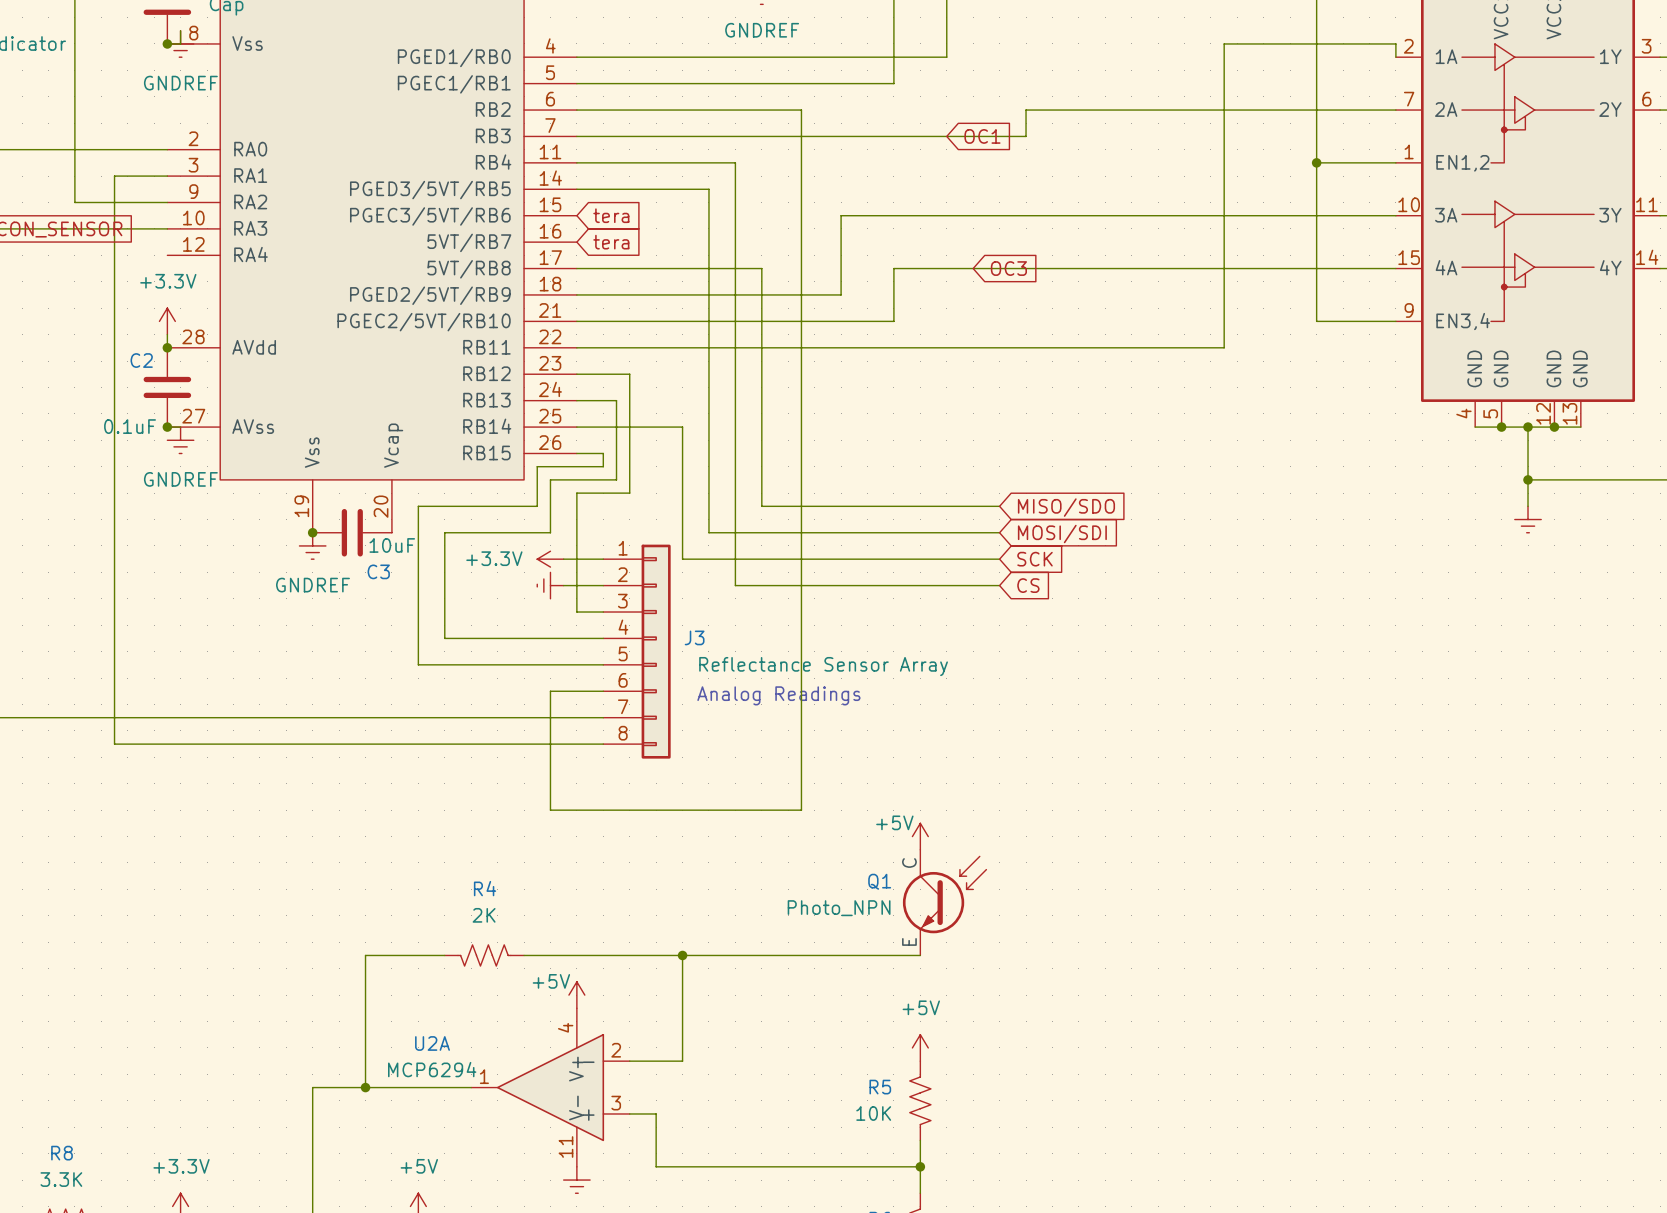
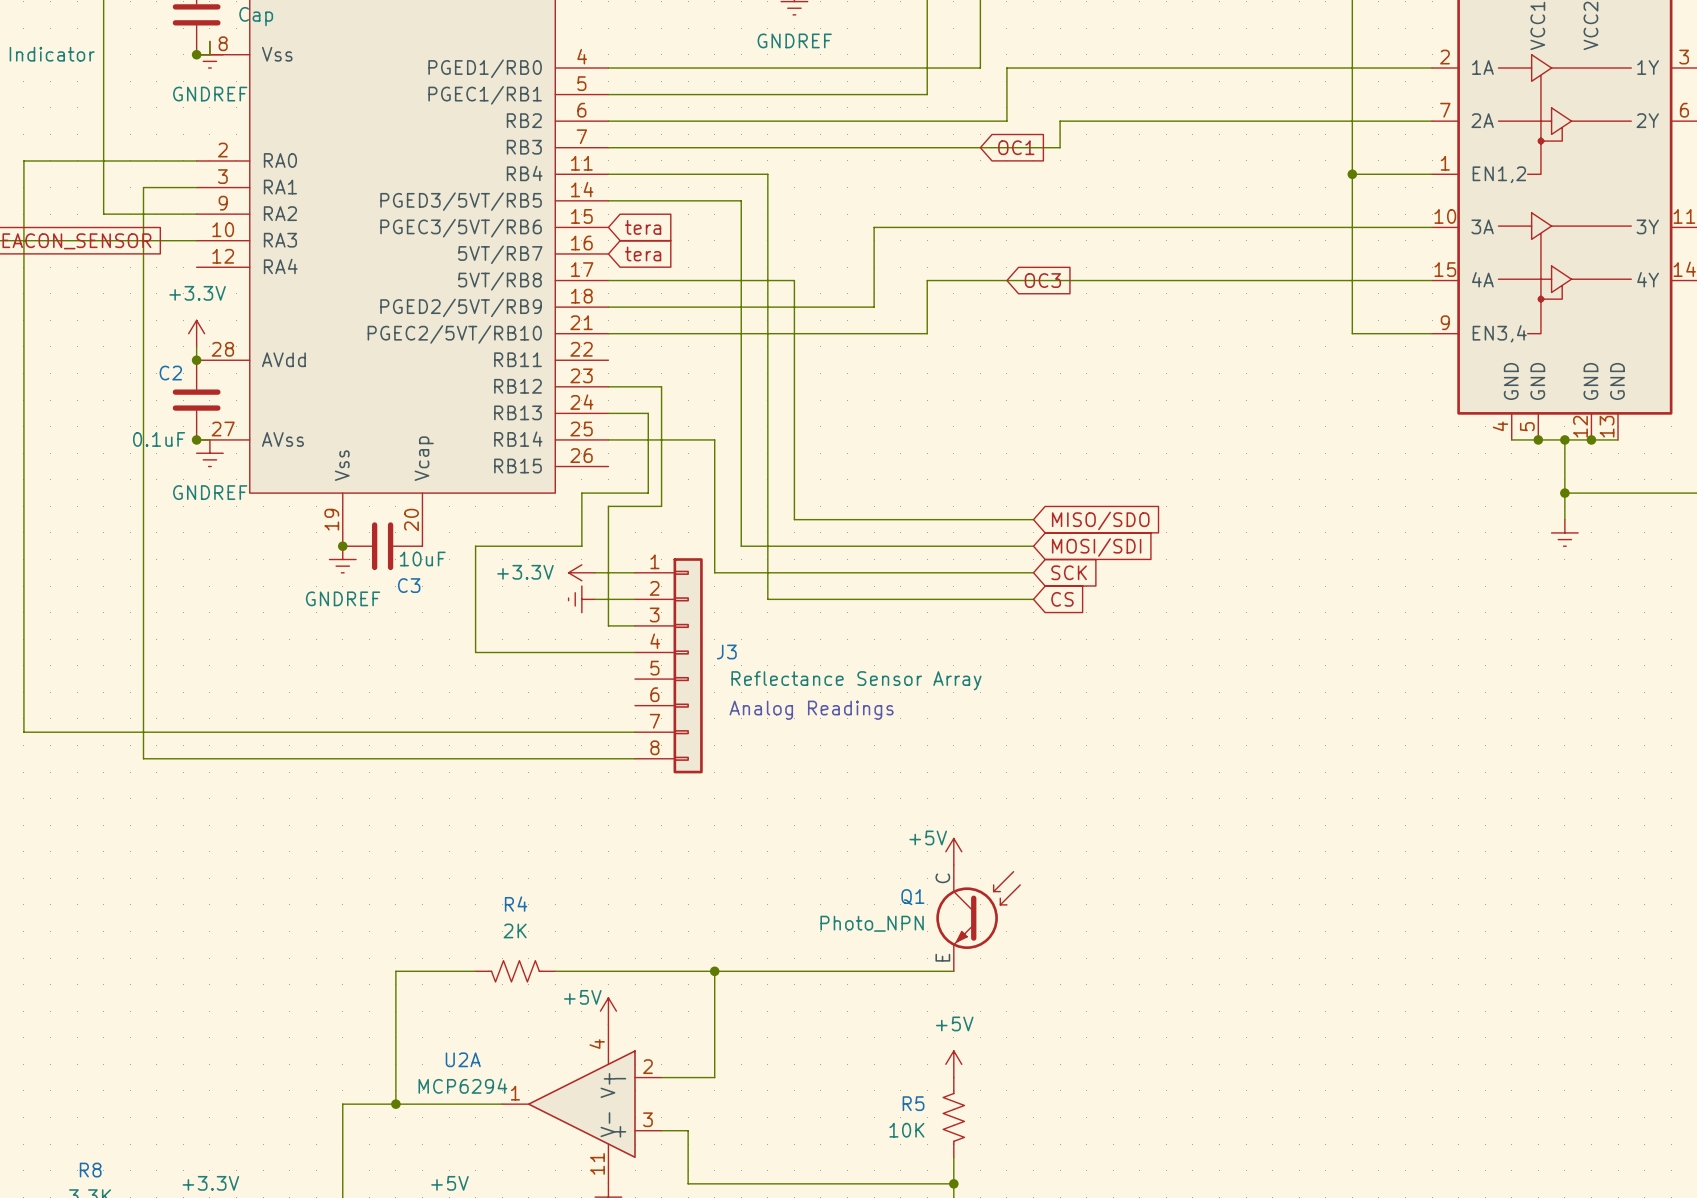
wire: (1395, 57) (1395, 43) (1224, 43) (1224, 347) (576, 347) -> (1432, 68) (1006, 68) (1006, 121) (834, 121)
wire: (801, 110) (801, 810) (550, 810) (550, 691) (603, 691) -> none
wire: (576, 453) (603, 453) (603, 466) (537, 466) (537, 506) (418, 506) (418, 664) (603, 664) -> none

